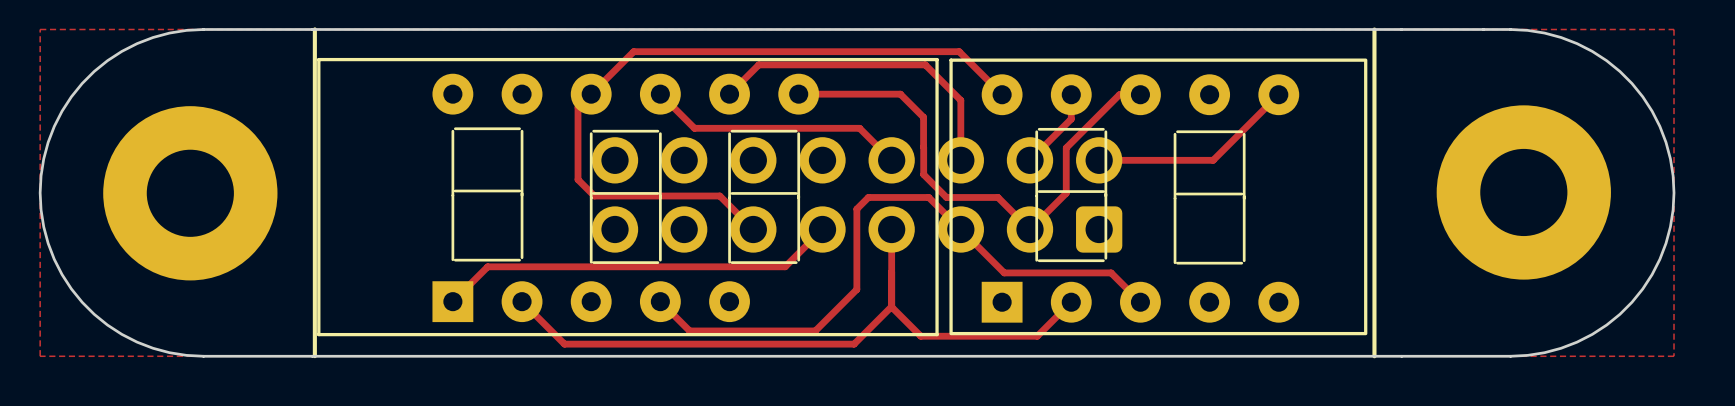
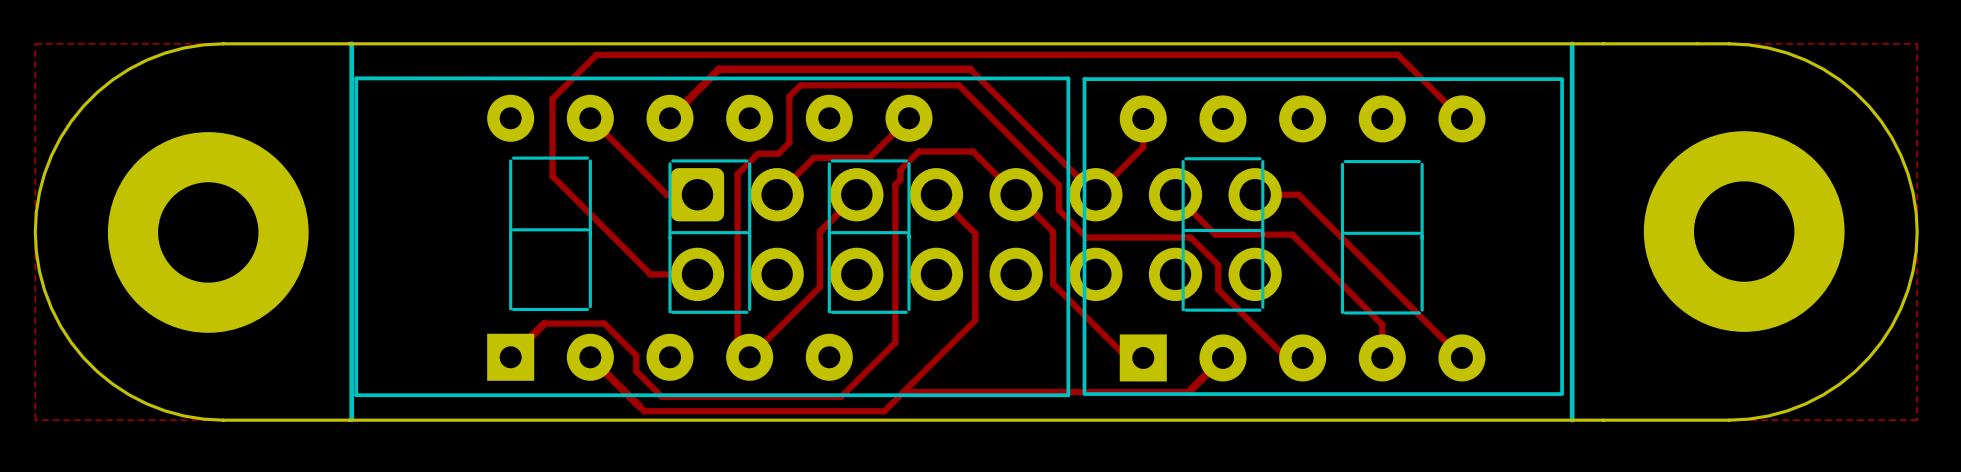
track: (852, 51) (959, 51) (1002, 94) -> (970, 69) (1095, 194) (1143, 147) (1143, 118)
track: none -> (590, 118) (666, 194) (697, 194)
track: (591, 94) (578, 107) (578, 179) (594, 196) (719, 196) (753, 229) -> none
track: (660, 94) (694, 128) (859, 128) (891, 160) -> none
track: (729, 94) (758, 64) (925, 64) (960, 100) (960, 160) -> none
track: (798, 94) (900, 94) (923, 117) (923, 174) (946, 197) (997, 197) (1030, 229) (1066, 193) (1066, 147) (1119, 94) (1140, 94) -> (909, 118) (869, 157) (814, 157) (777, 194)
track: (1071, 94) (1071, 119) (1030, 160) -> (1382, 357) (1382, 324) (1292, 234) (1215, 234) (1175, 194)
track: (1278, 94) (1213, 160) (1099, 160) -> (1461, 357) (1298, 194) (1255, 194)
track: none -> (1461, 118) (1397, 54) (596, 54) (552, 98) (552, 176) (650, 274) (697, 274)
part rotation: 0° (857, 194) -> 180° (976, 234)
track: (822, 229) (785, 266) (487, 266) (482, 272) -> (1143, 357) (1127, 357) (1053, 283) (1053, 231) (972, 151) (918, 151) (900, 170) (900, 179) (895, 184) (895, 342) (841, 396) (661, 396) (636, 371) (636, 355) (604, 323) (544, 323)
track: (891, 229) (891, 307) (920, 336) (1037, 336) (1041, 331) -> (903, 392) (1188, 392)
track: (660, 301) (689, 330) (815, 330) (856, 289) (856, 209) (868, 197) (928, 197) (1004, 272) (1111, 272) (1140, 302) -> (856, 194) (819, 231) (819, 287) (749, 357) (737, 345) (737, 174) (757, 153) (778, 153) (789, 142) (789, 96) (800, 85) (958, 85) (1058, 185) (1058, 210) (1086, 237) (1190, 237) (1218, 265) (1218, 289) (1286, 357) (1302, 357)
track: (891, 306) (854, 344) (564, 344) -> (936, 194) (975, 233) (975, 320) (884, 411) (644, 411) (639, 406)

